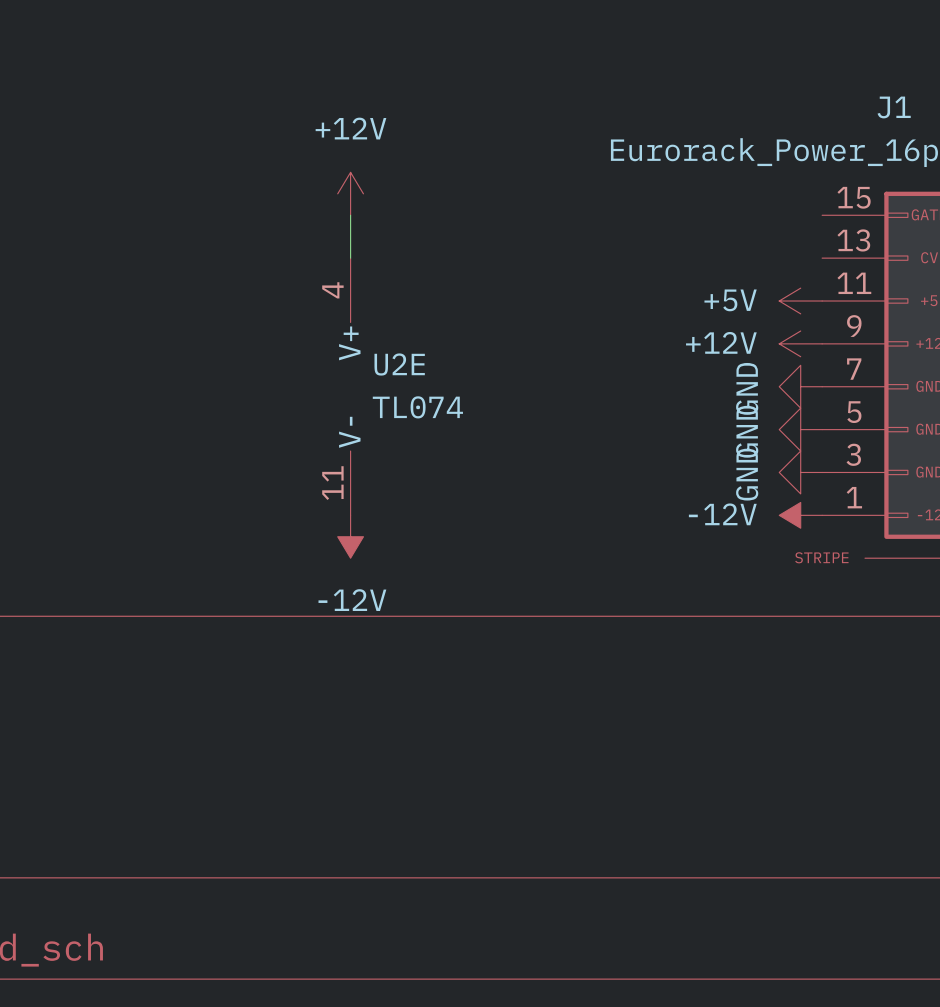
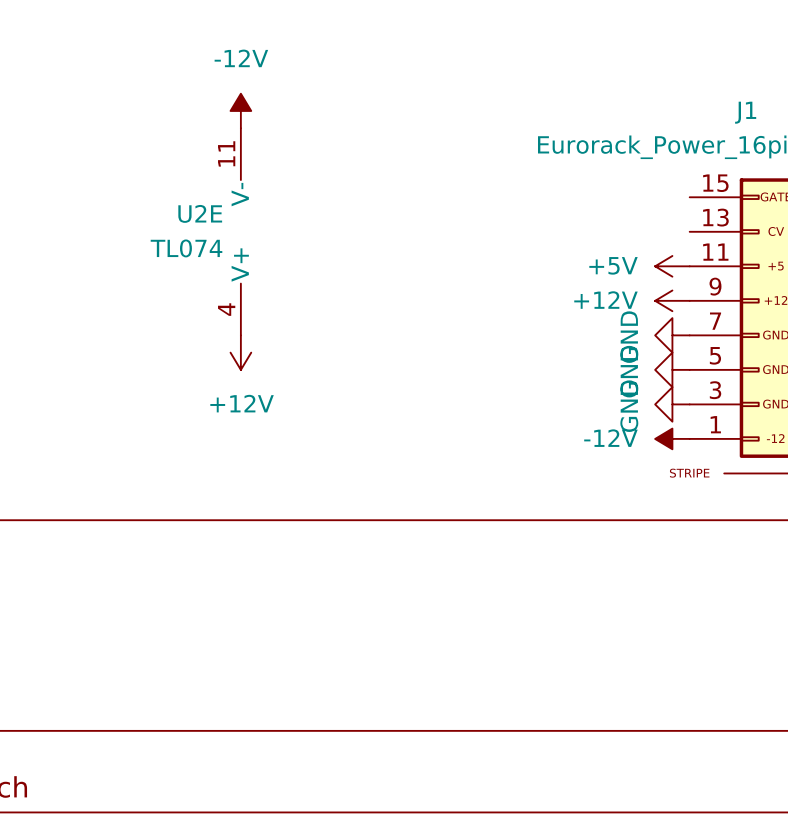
power symbol: none -> -12V (240, 110)
power symbol rotation: 0° (350, 193) -> 180° (240, 352)
power symbol position: +12V (350, 193) -> +12V (240, 352)
wire: (350, 215) (350, 258) -> none
U2E name position: U2E (399, 364) -> U2E (200, 213)
U2E rotation: 0° (350, 386) -> 180° (240, 231)
U2E position: (350, 386) -> (240, 231)
U2E value position: TL074 (417, 407) -> TL074 (186, 248)
power symbol: -12V (350, 536) -> none

